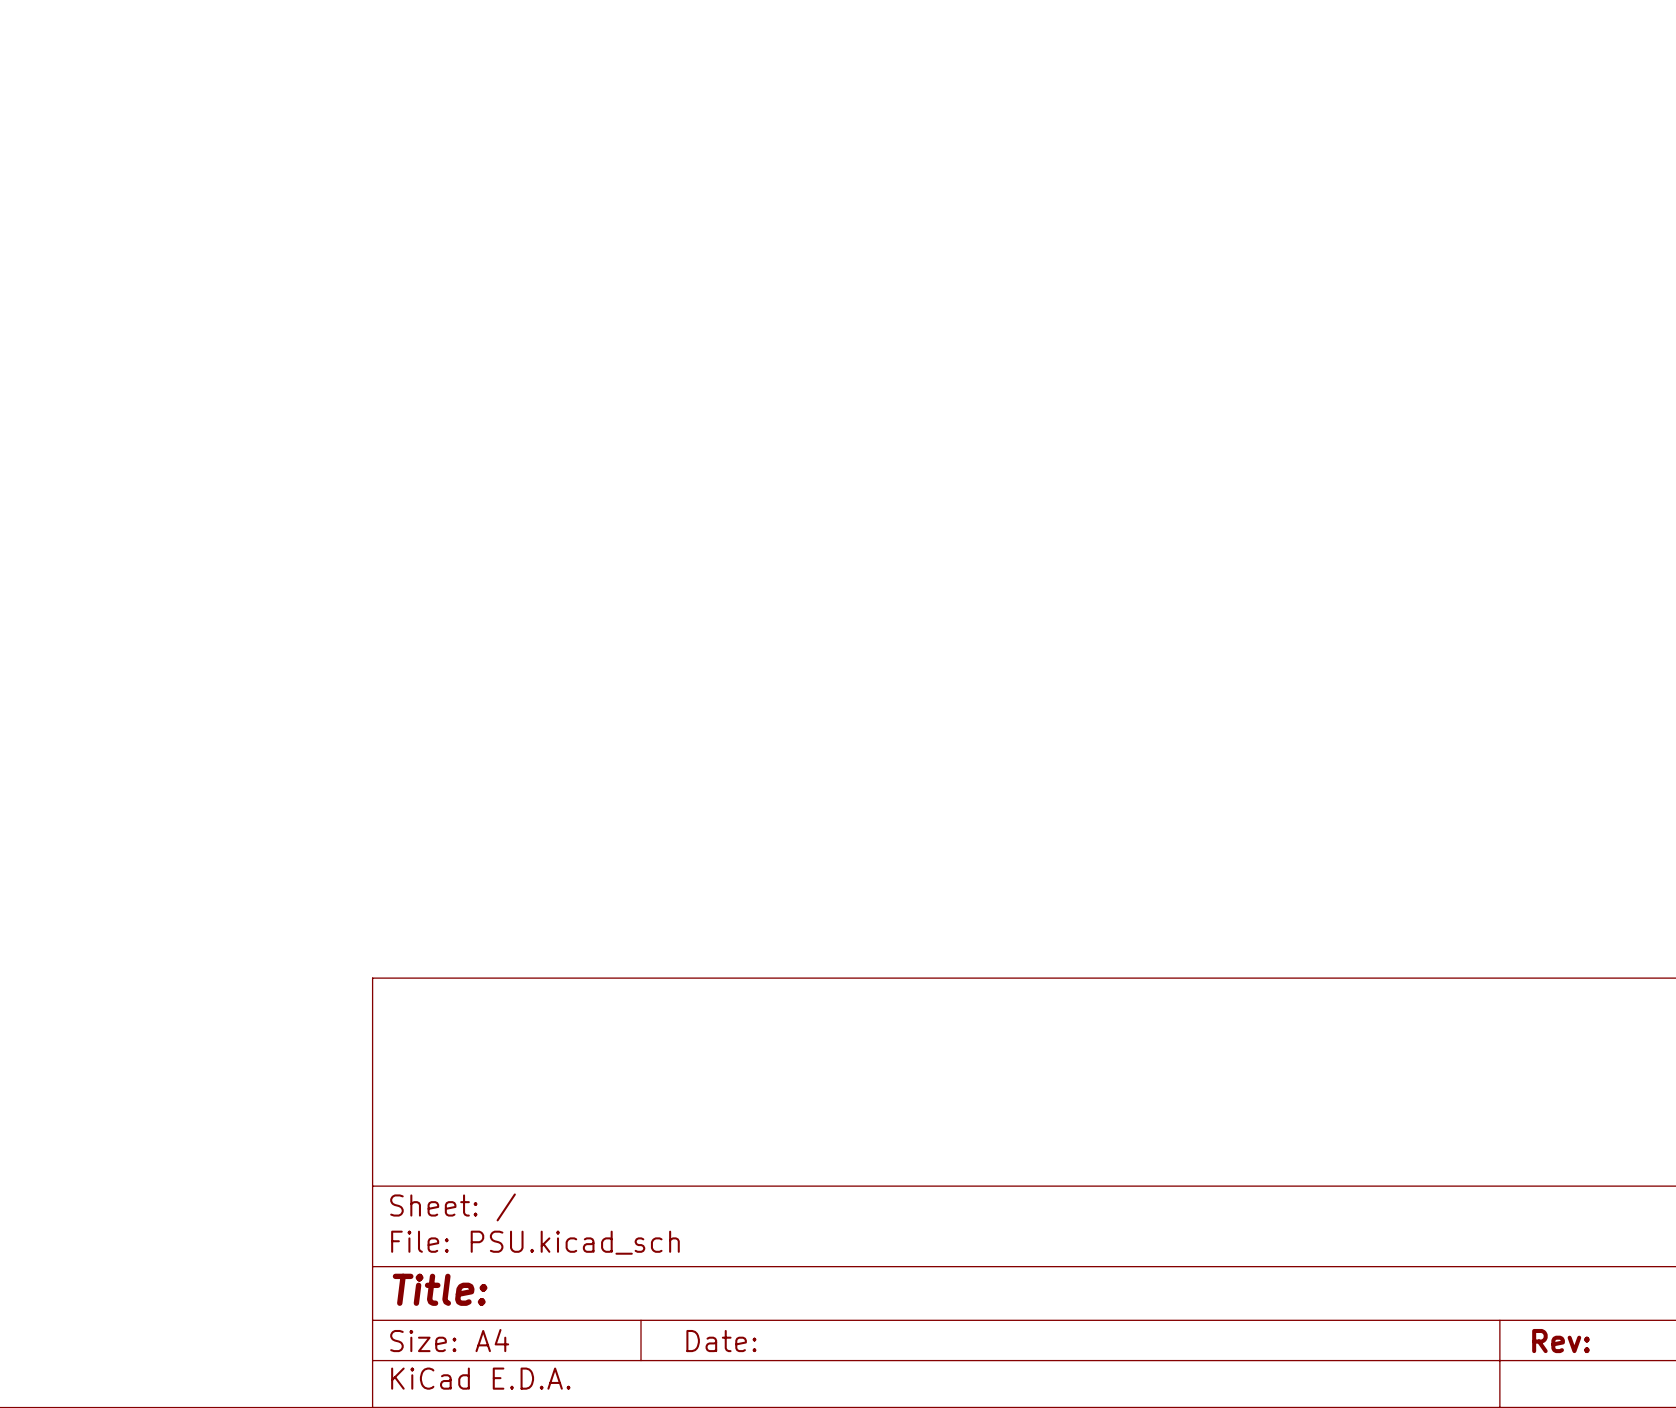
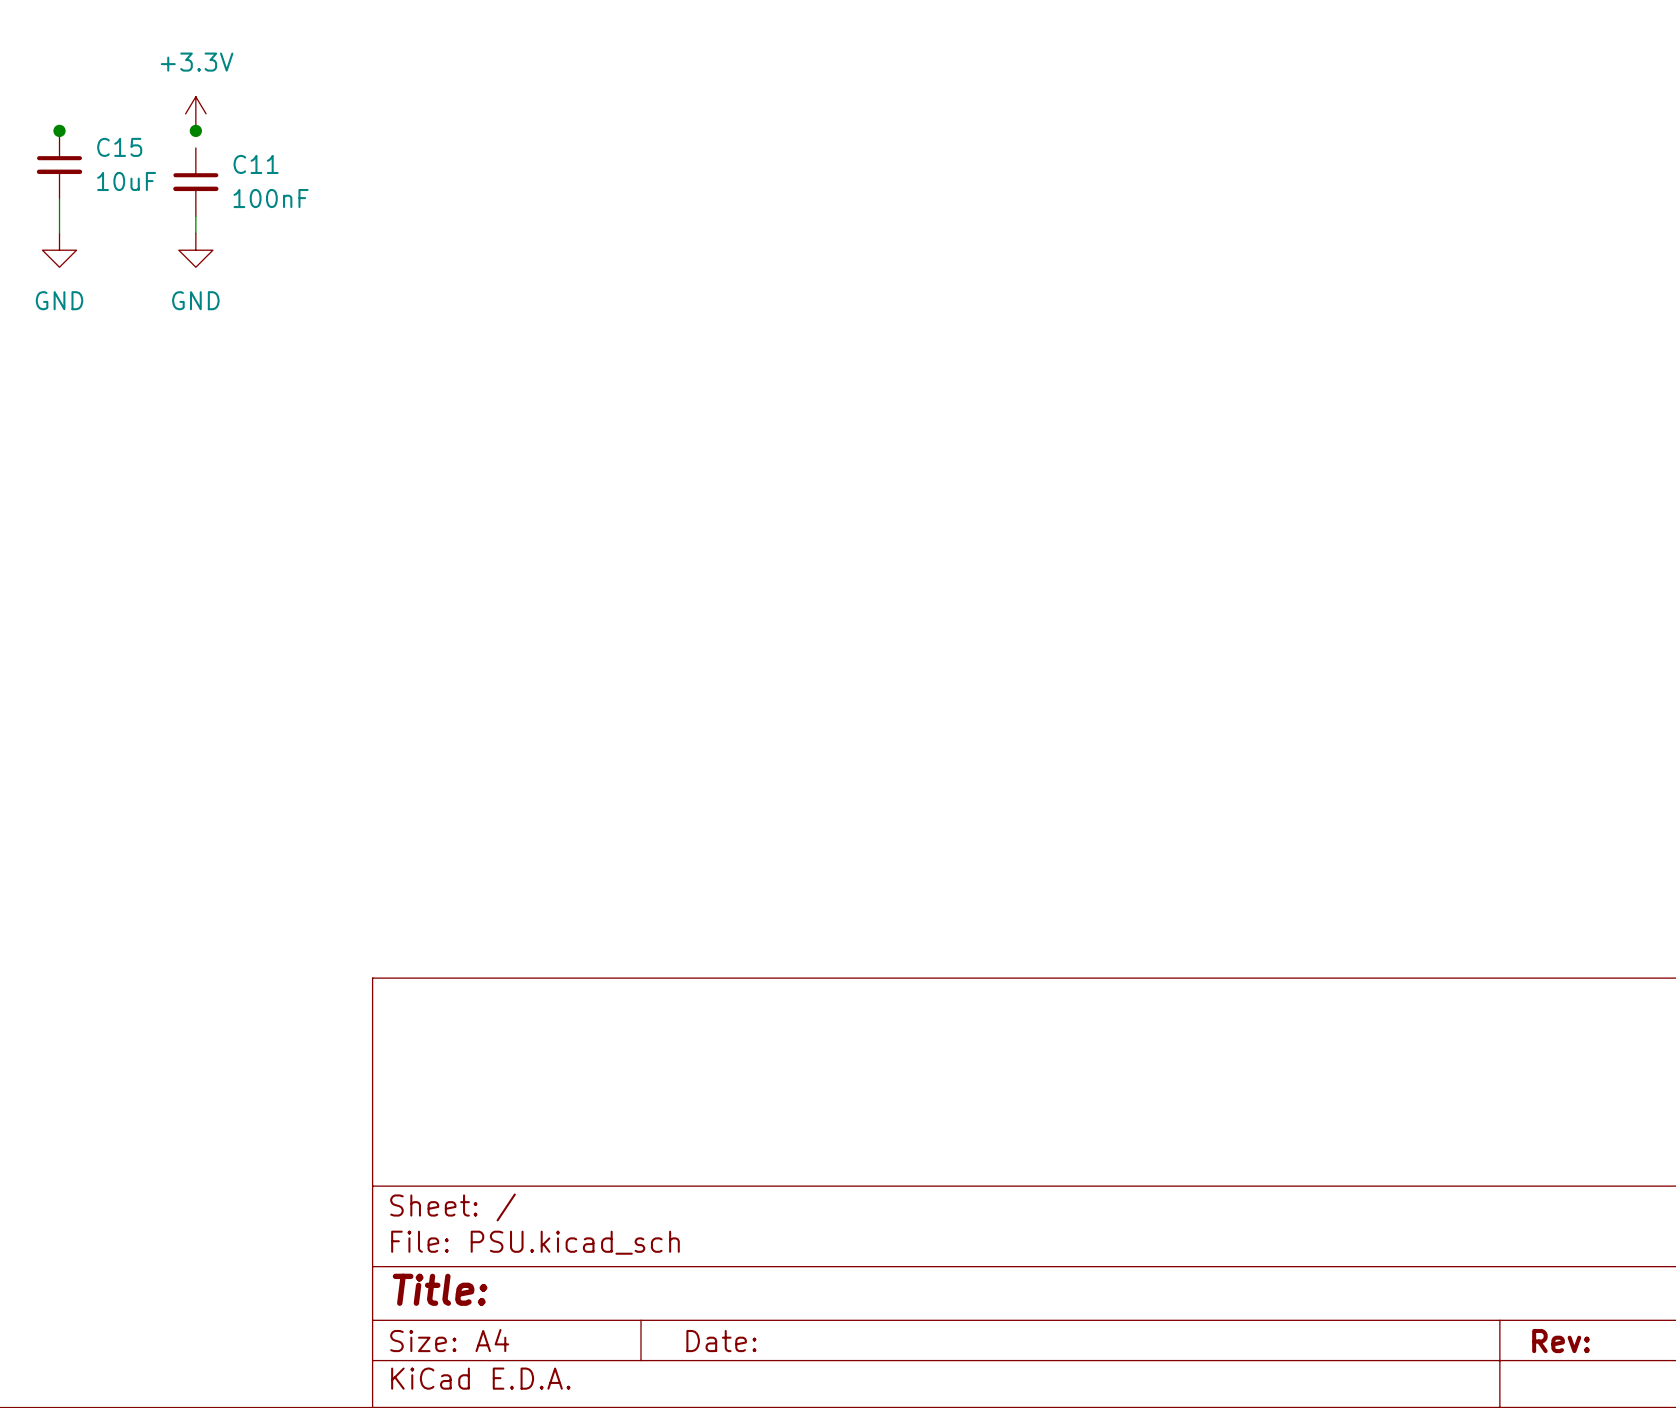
power symbol: none -> +3.3V (195, 113)
junction: none -> (59, 130)
junction: none -> (195, 130)
C15: none -> 10uF (59, 164)
C11: none -> 100nF (195, 182)
wire: none -> (59, 199) (59, 233)
wire: none -> (195, 216) (195, 233)
power symbol: none -> GND (59, 250)
power symbol: none -> GND (195, 250)

